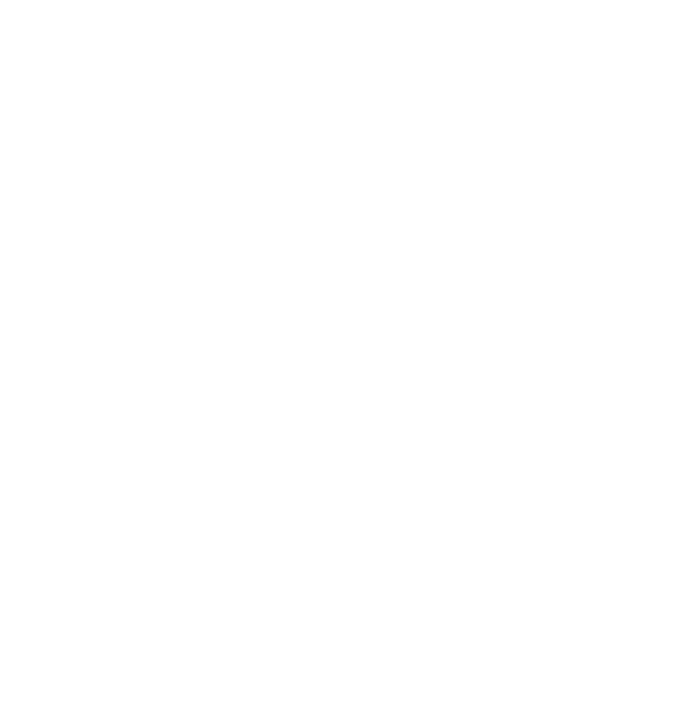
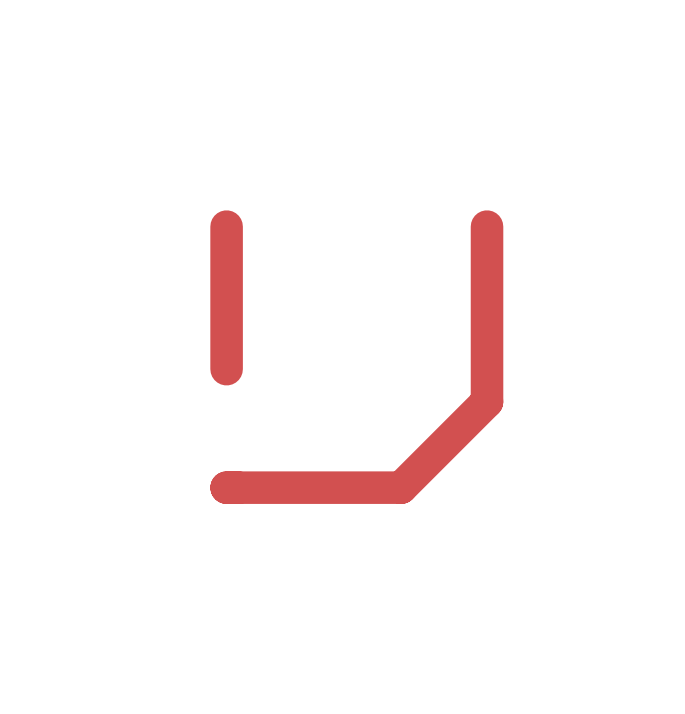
track: none -> (226, 226) (226, 369)
track: none -> (487, 226) (487, 401) (401, 487) (226, 487)

